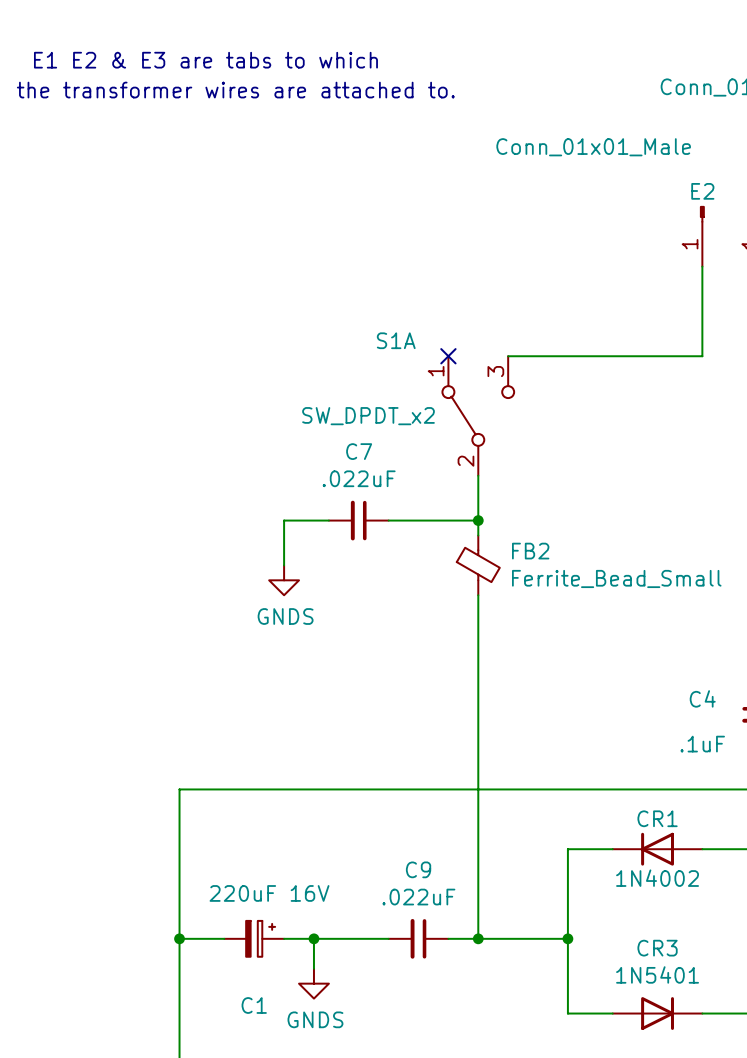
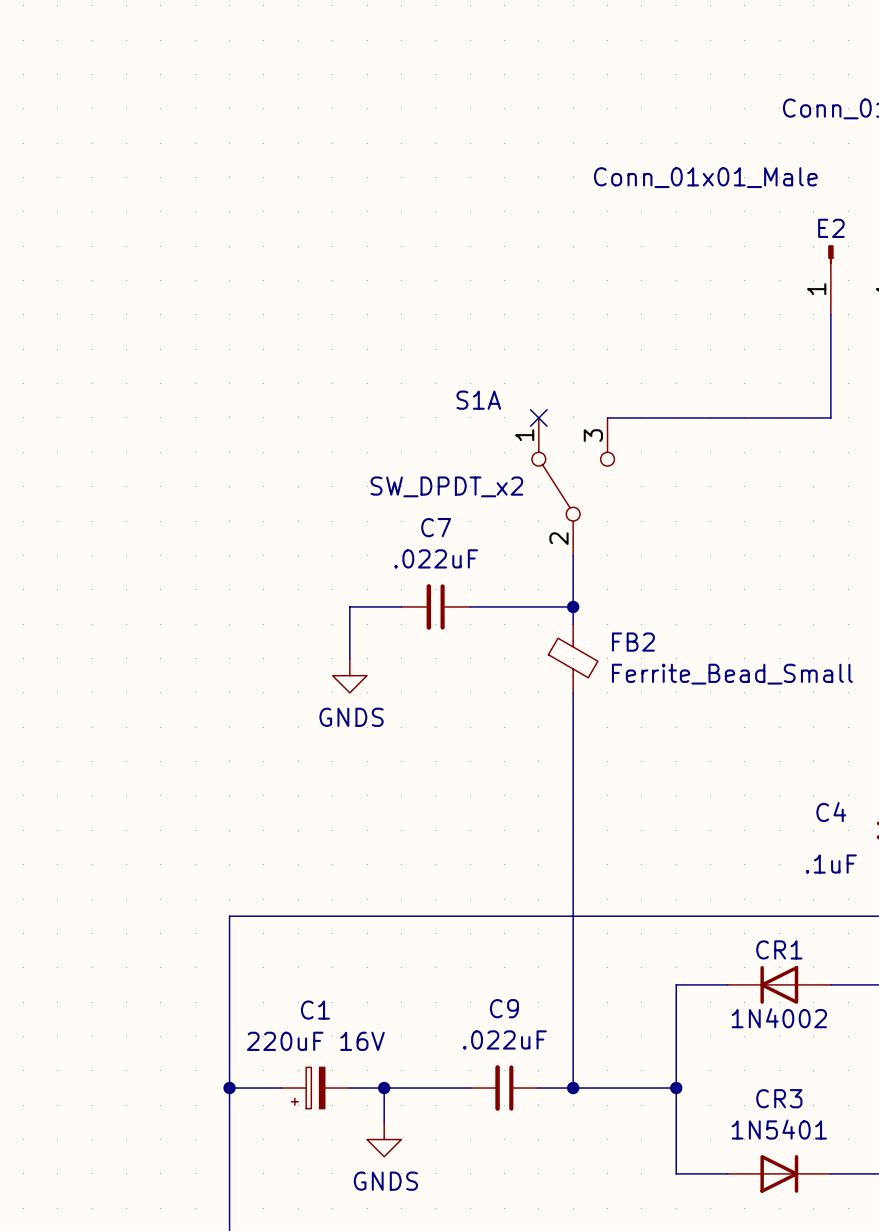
text: E1 E2 & E3 are tabs to which (205, 60) -> none
text: the transformer wires are attached to. (235, 90) -> none
C1 rotation: 0° (260, 938) -> 180° (308, 1088)

